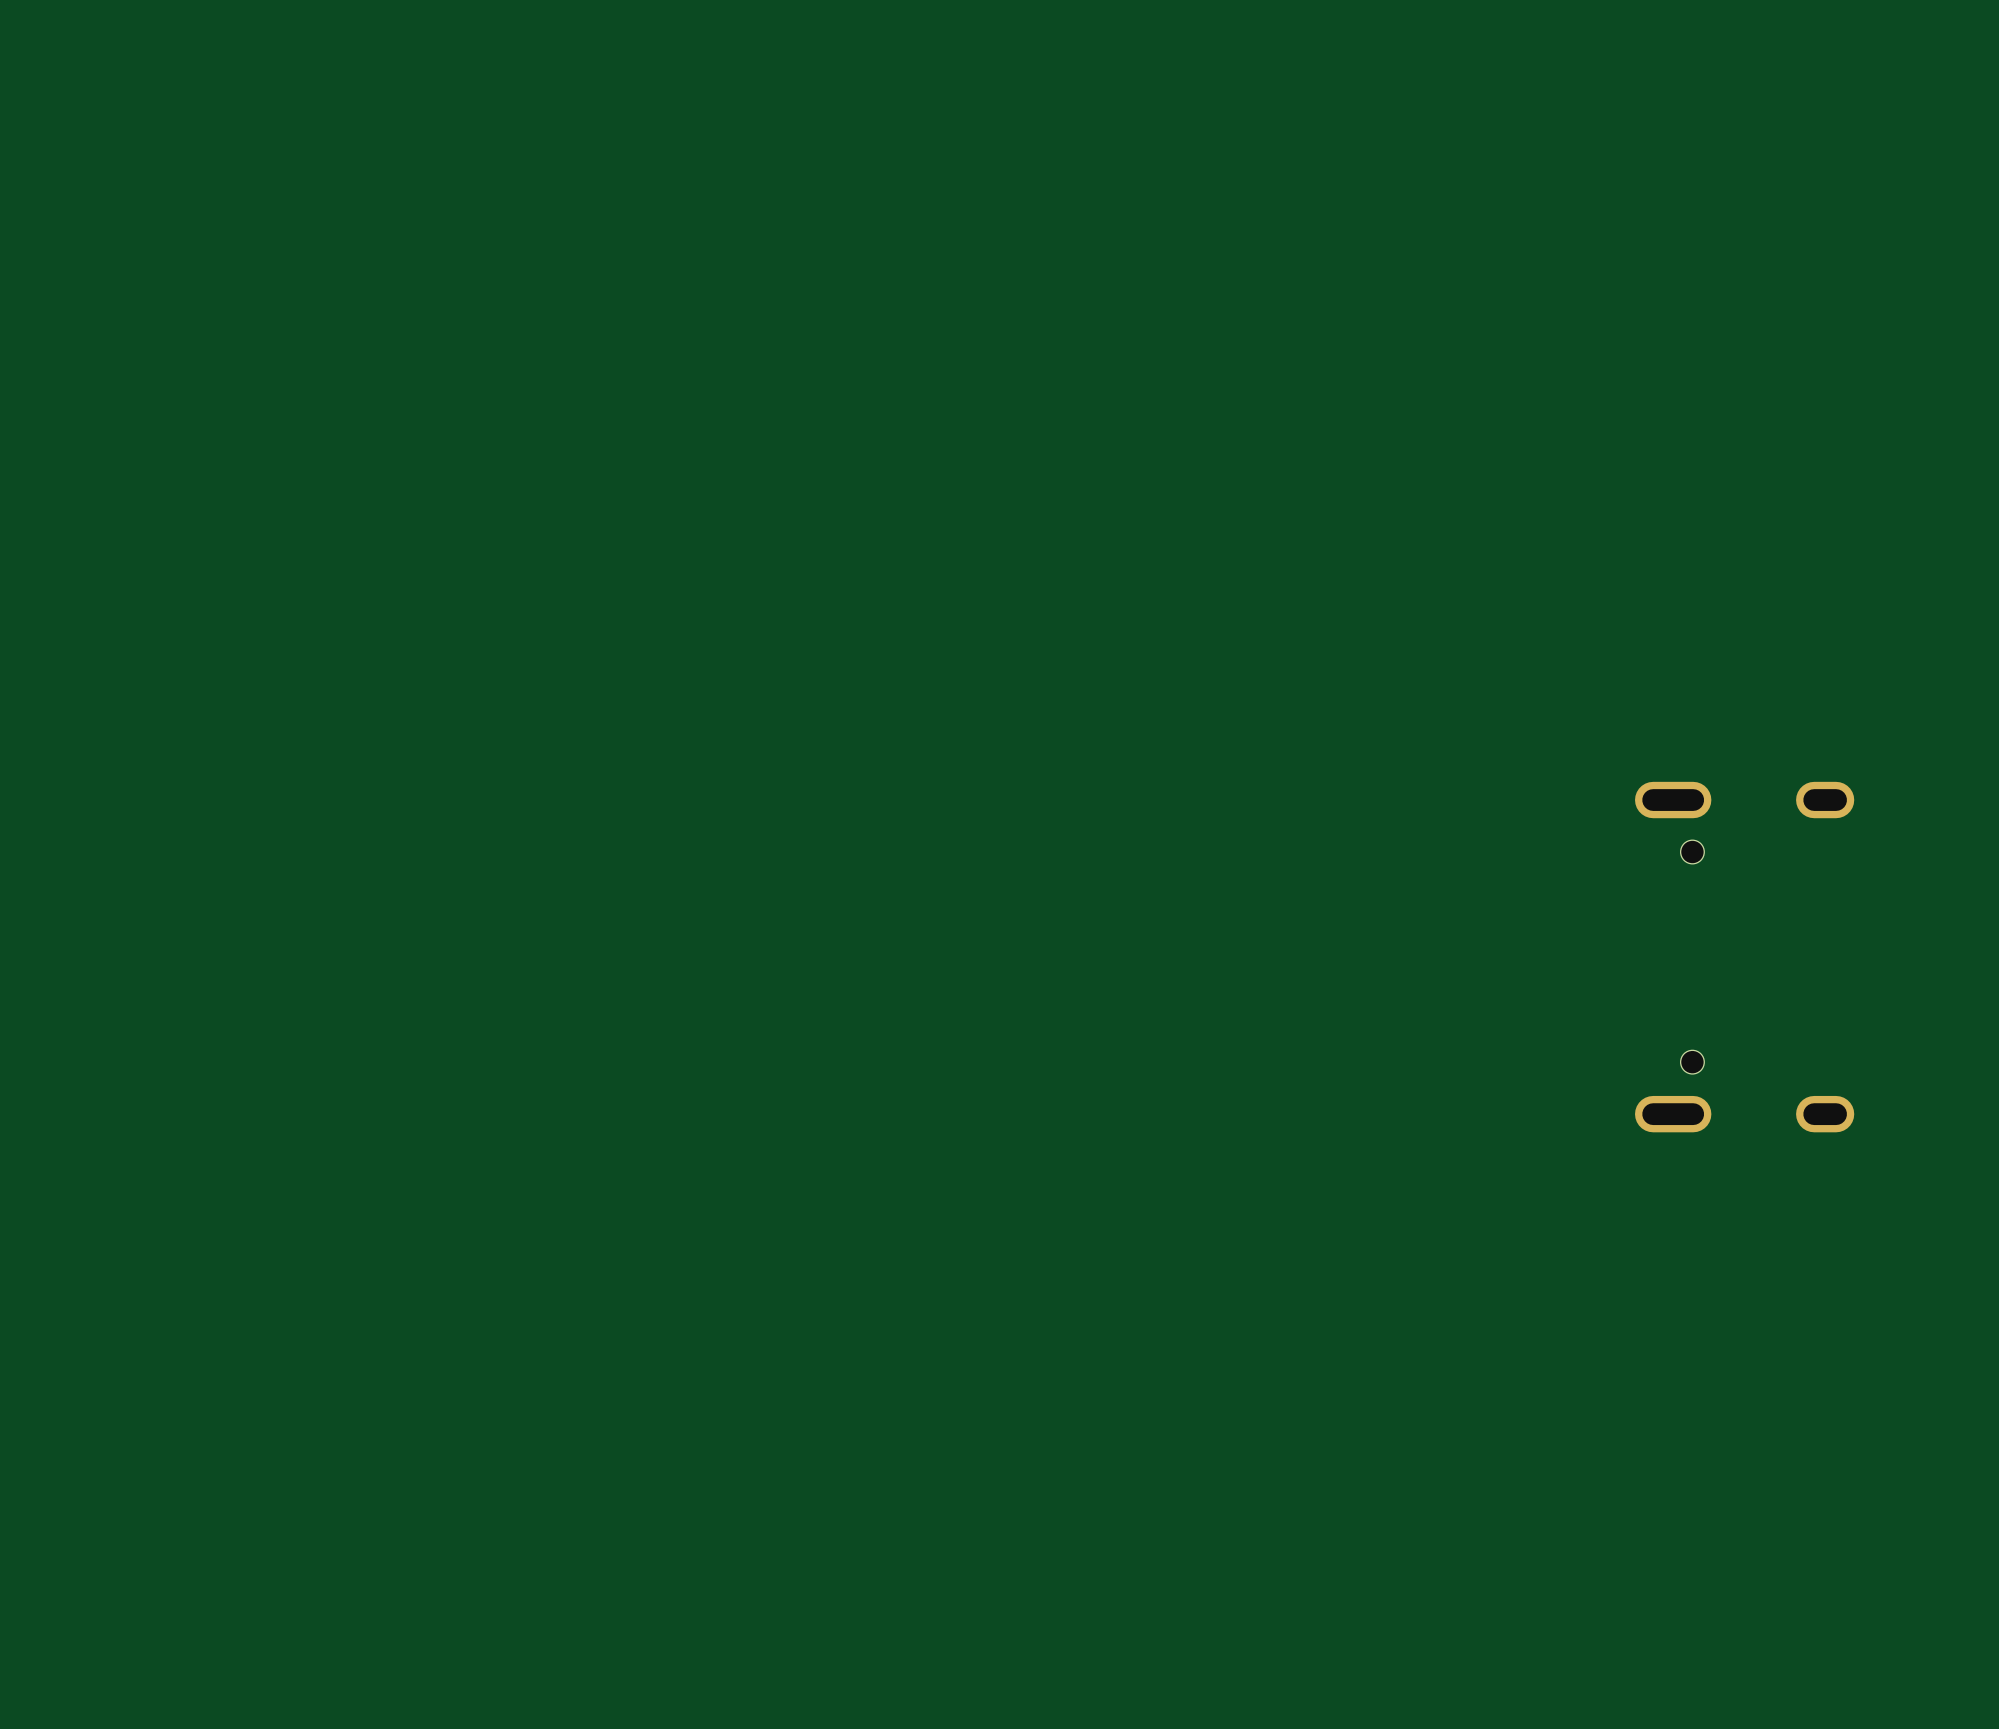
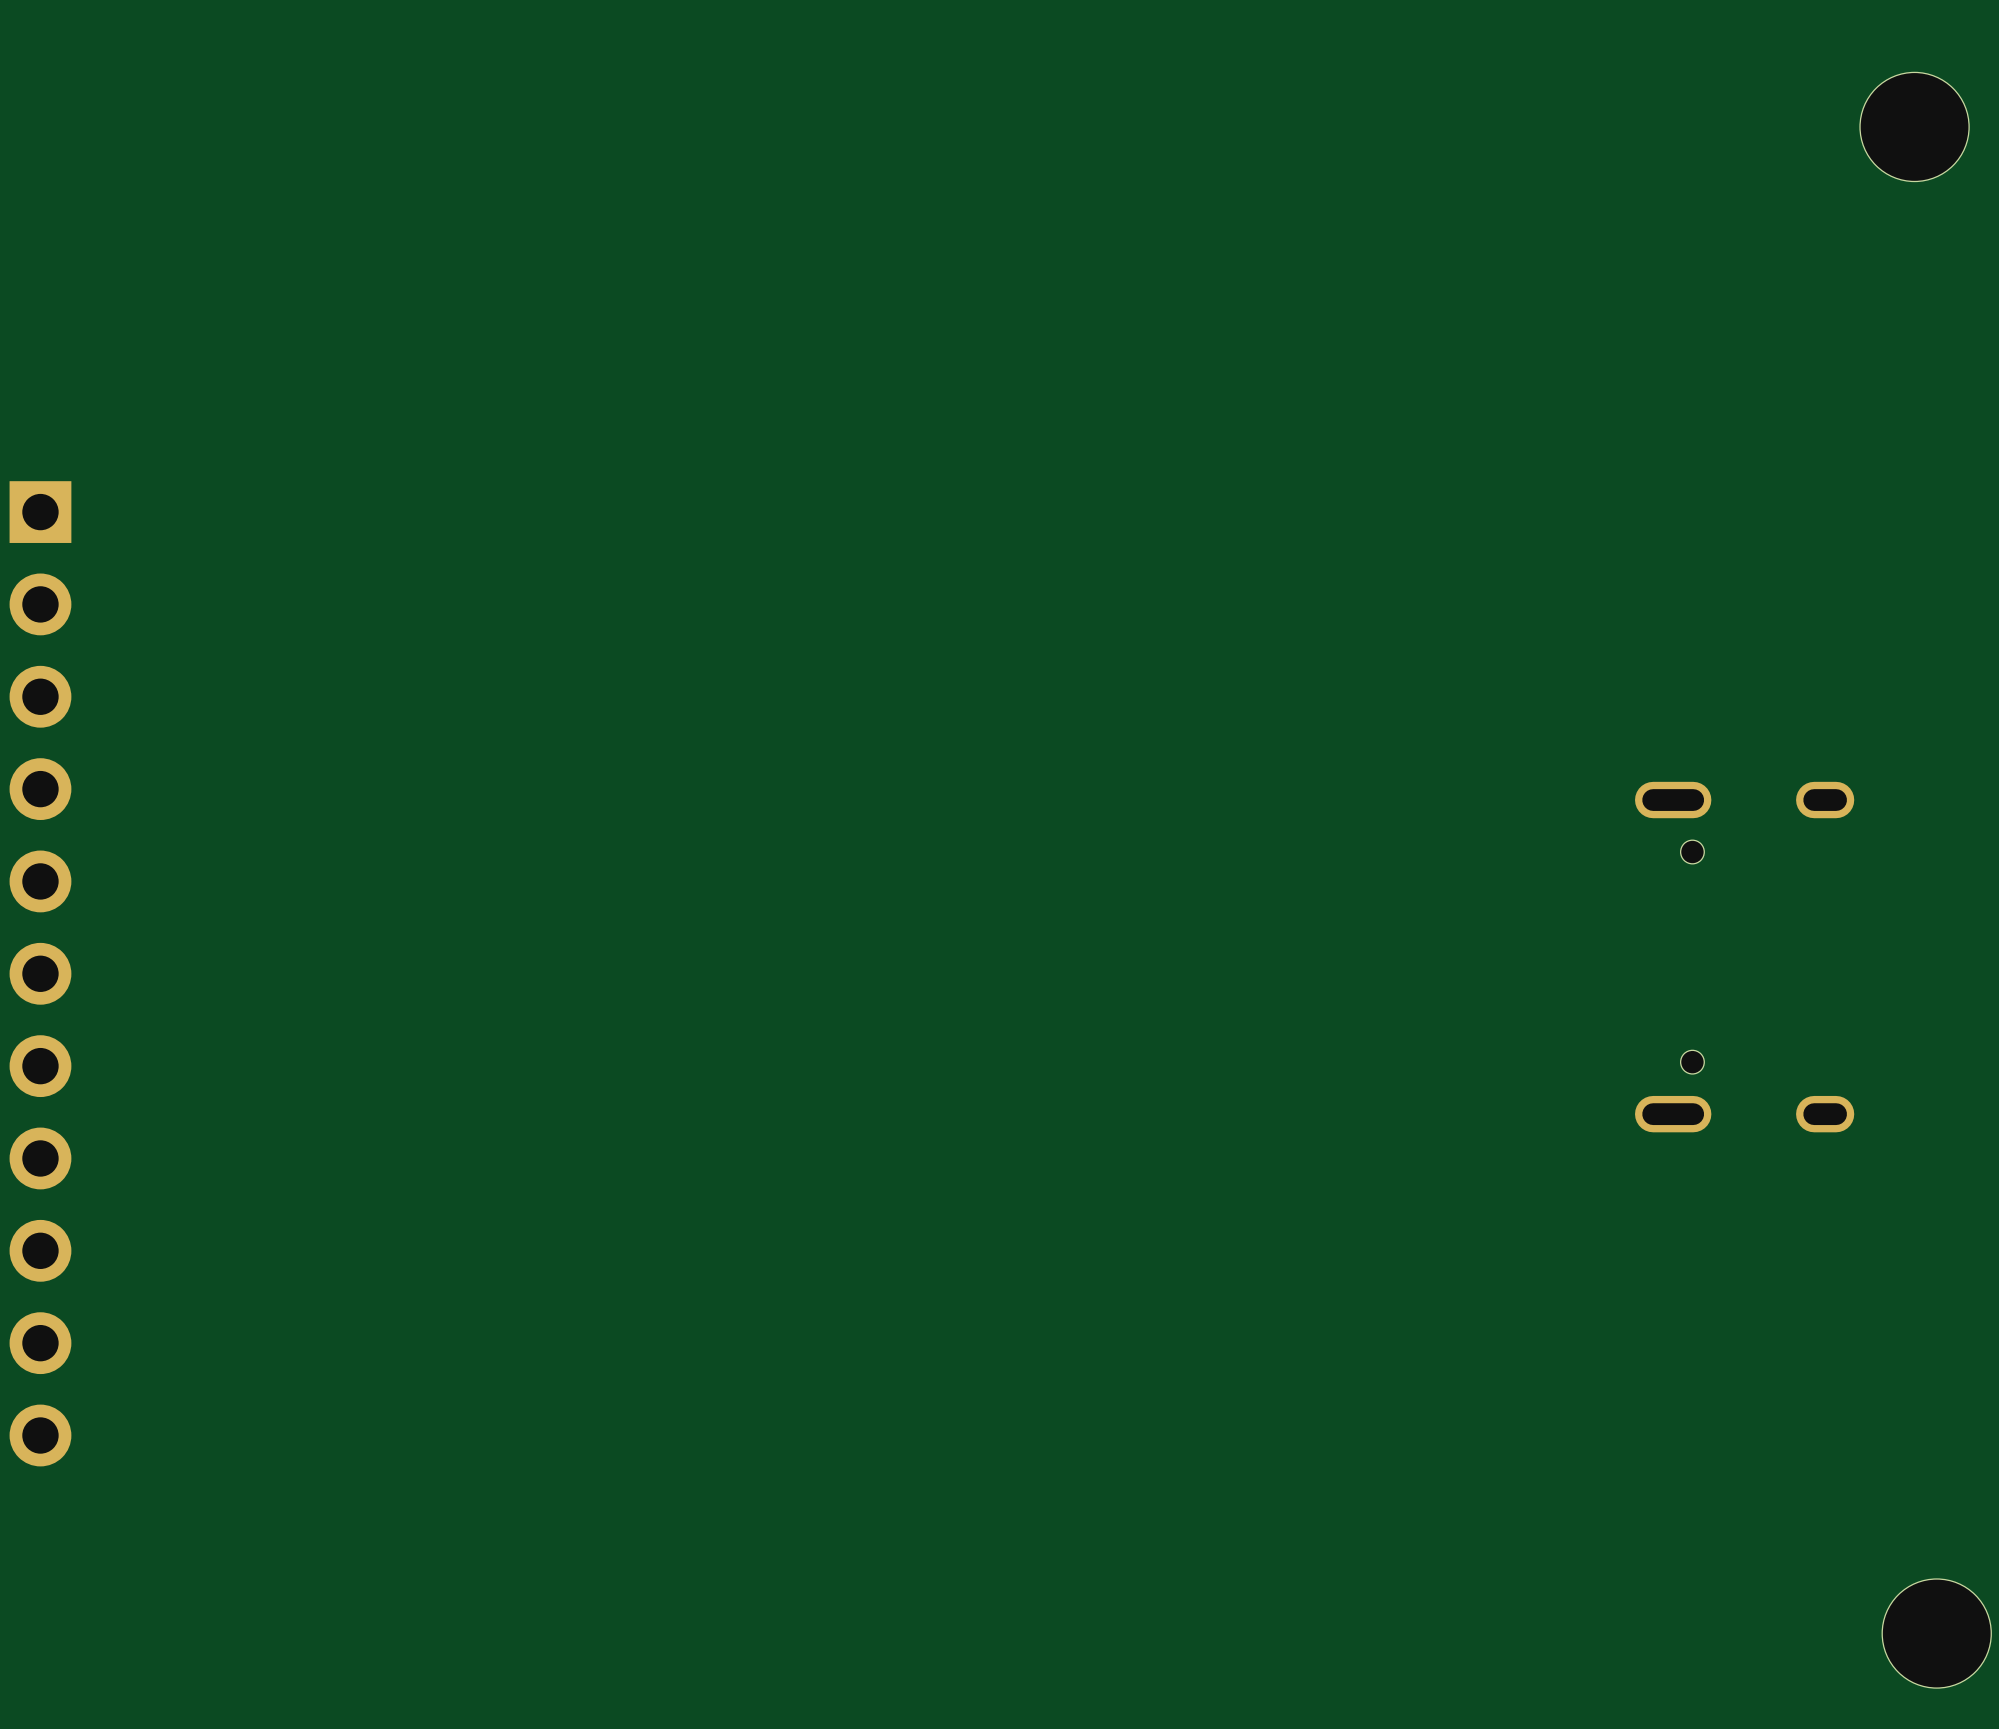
part: none -> (1914, 126)
part: none -> (40, 973)
part: none -> (1936, 1633)

